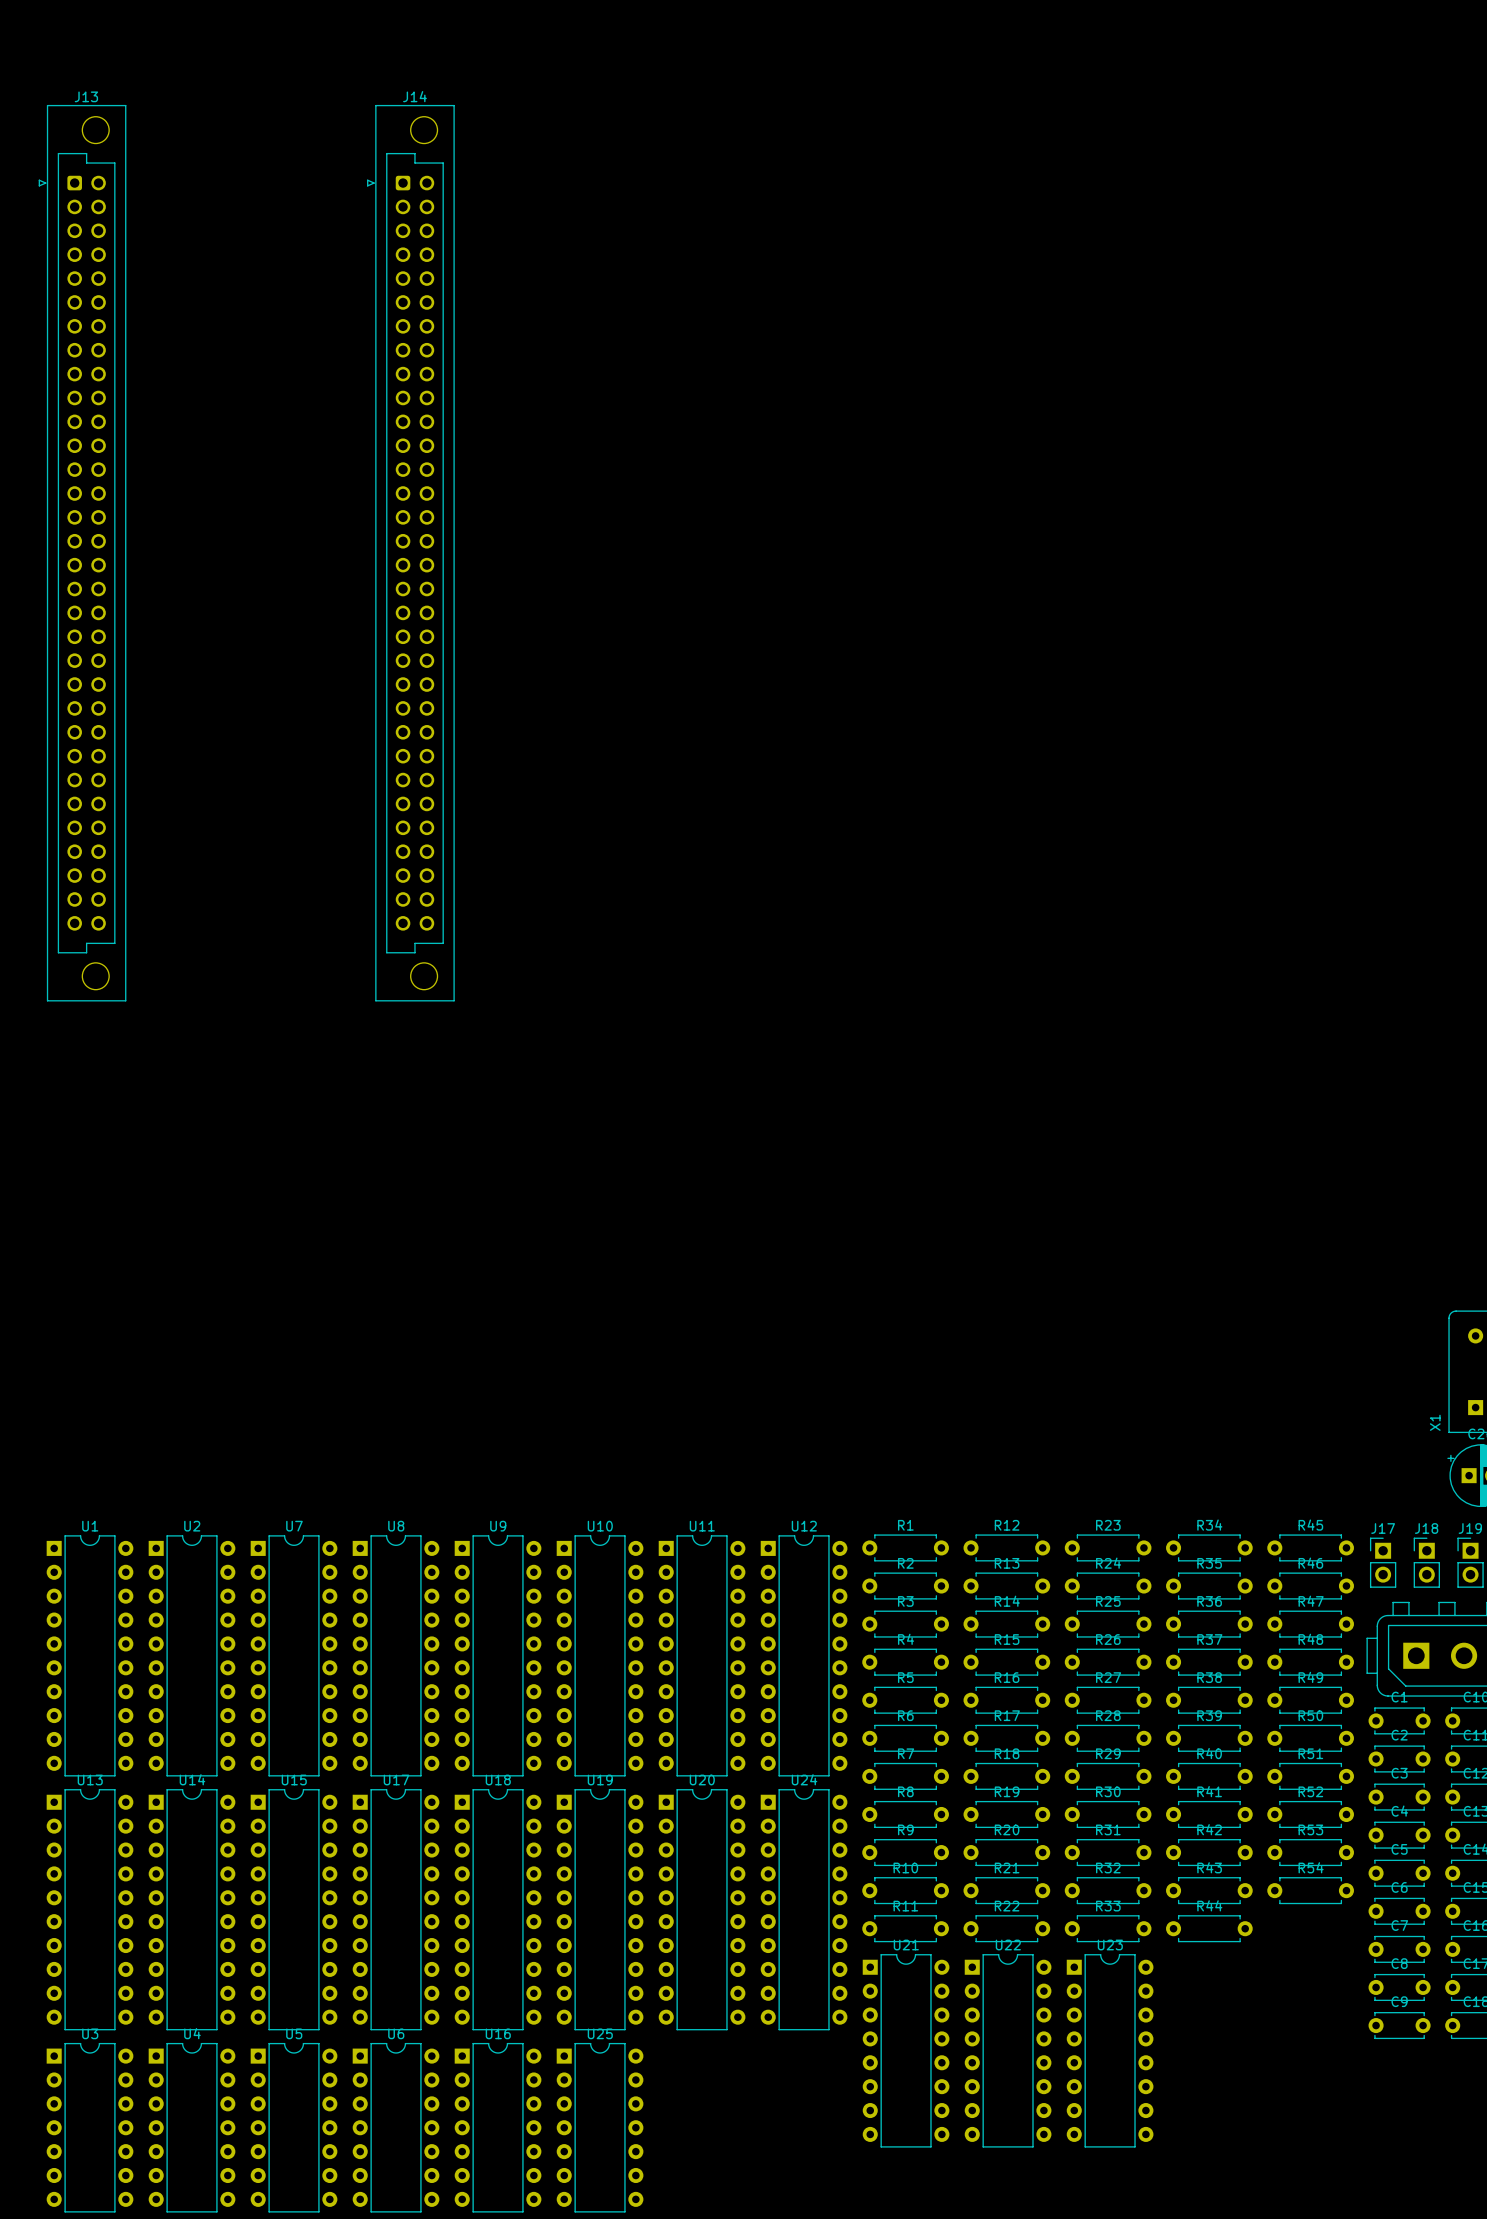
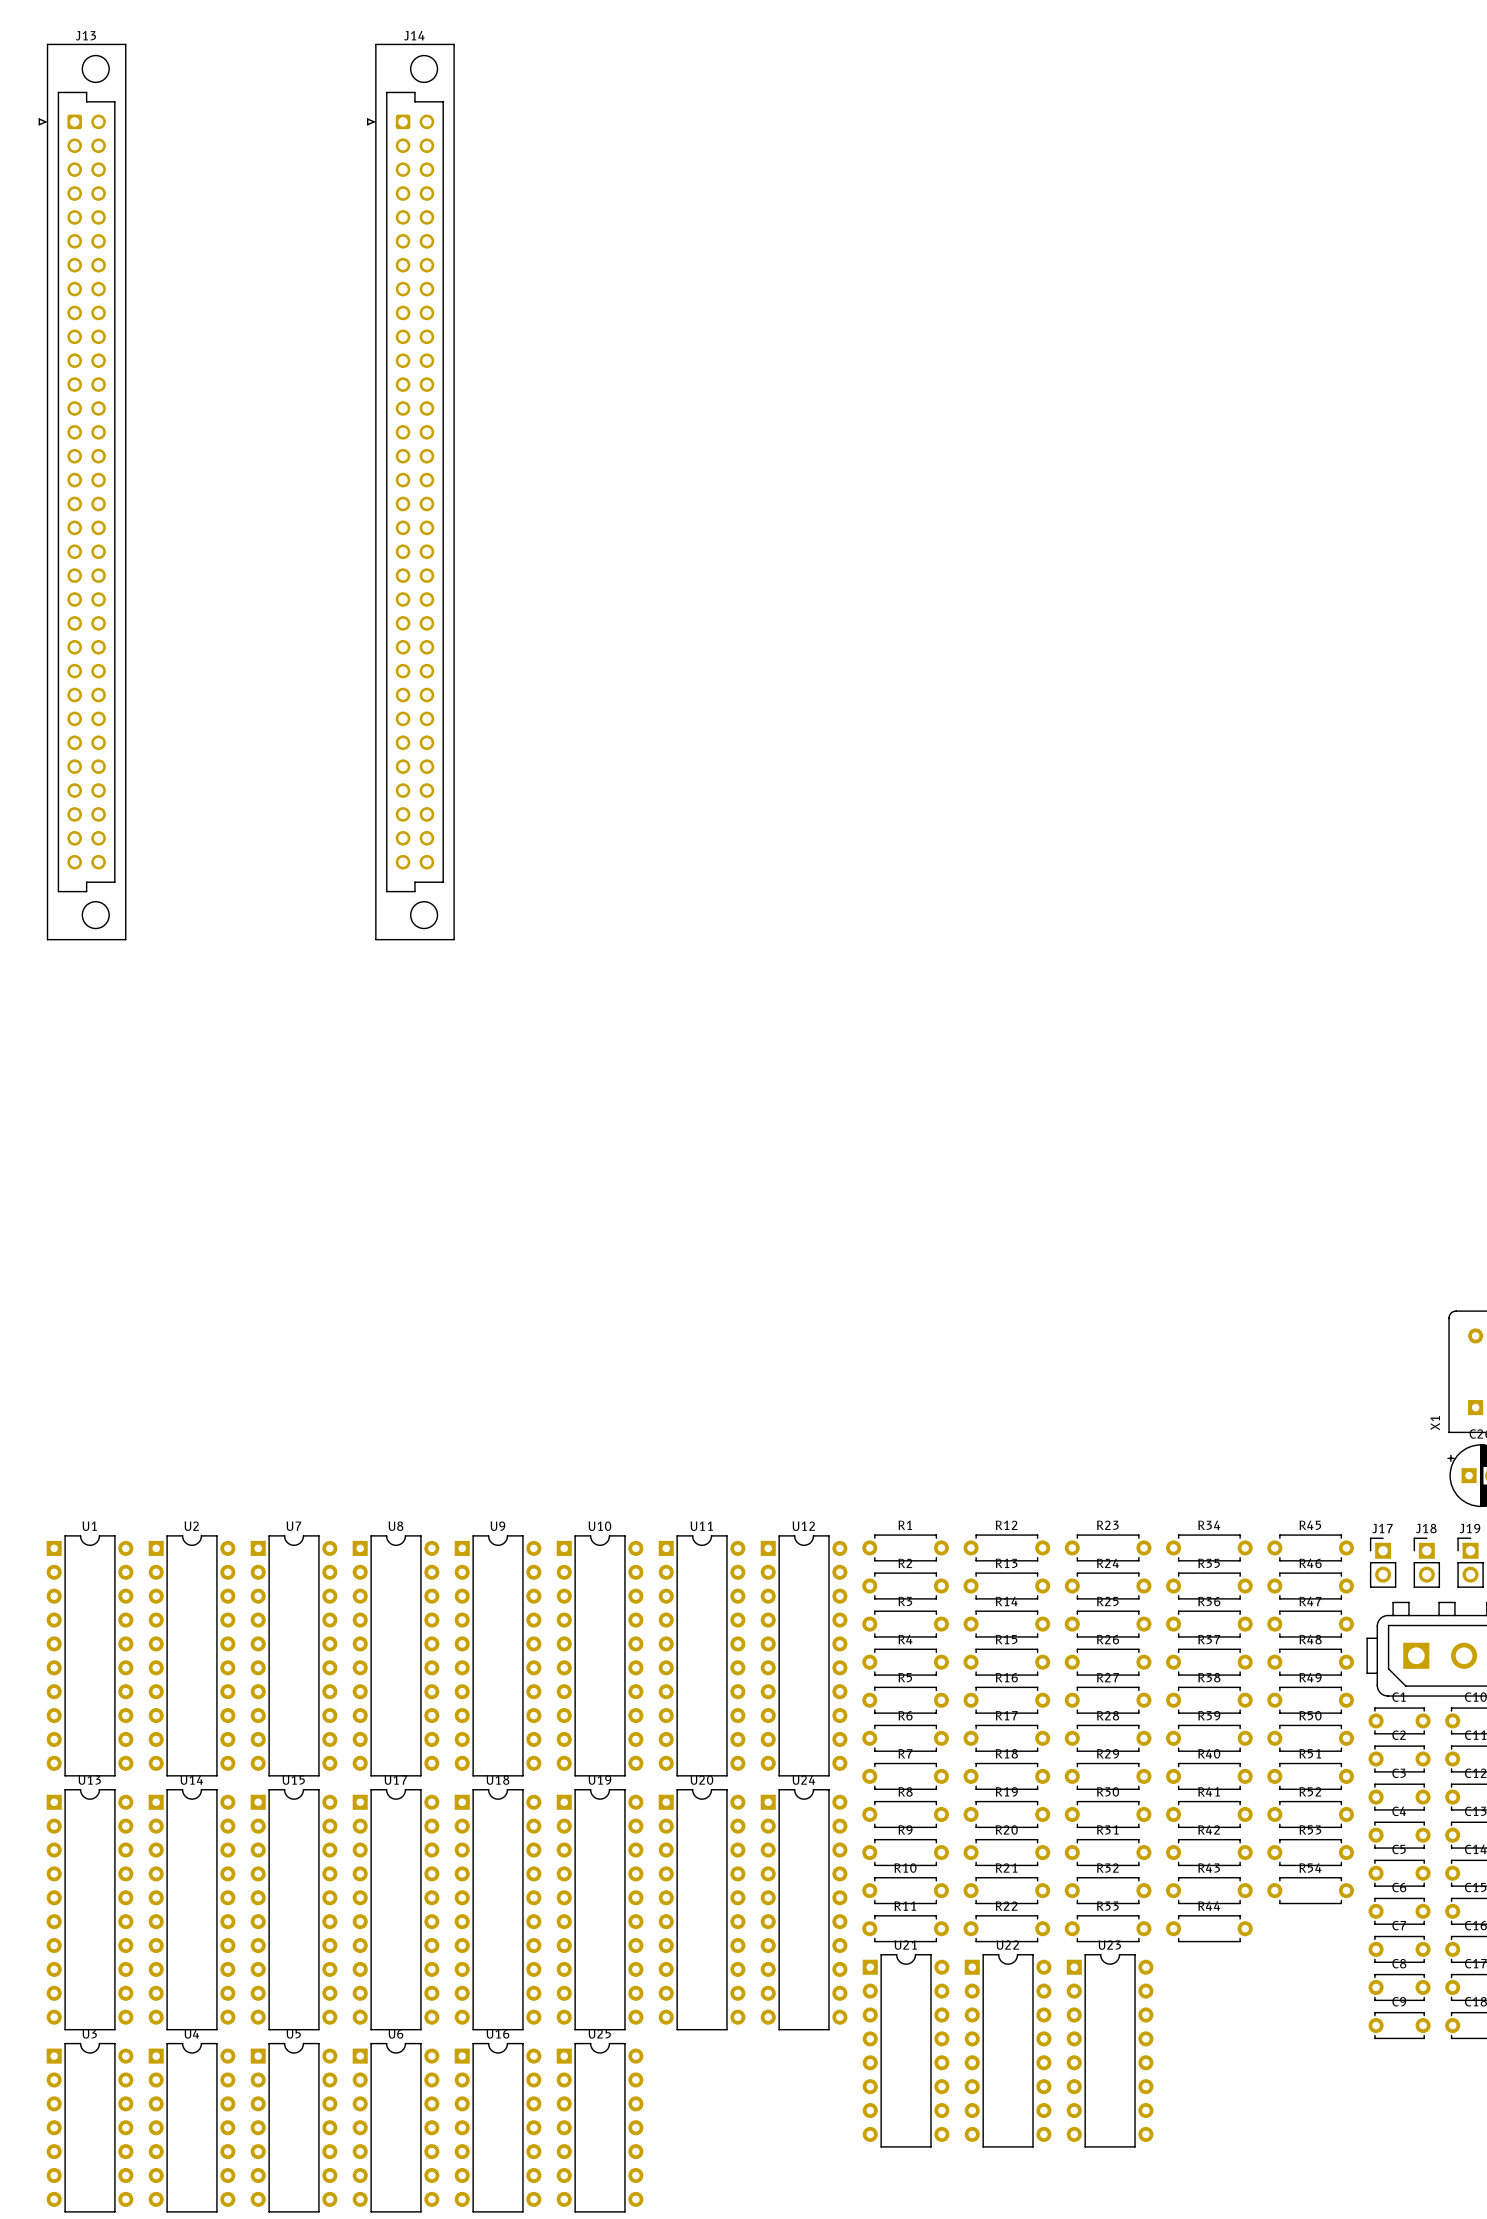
J13 position: (82, 553) -> (82, 492)
J14 position: (410, 553) -> (410, 492)

